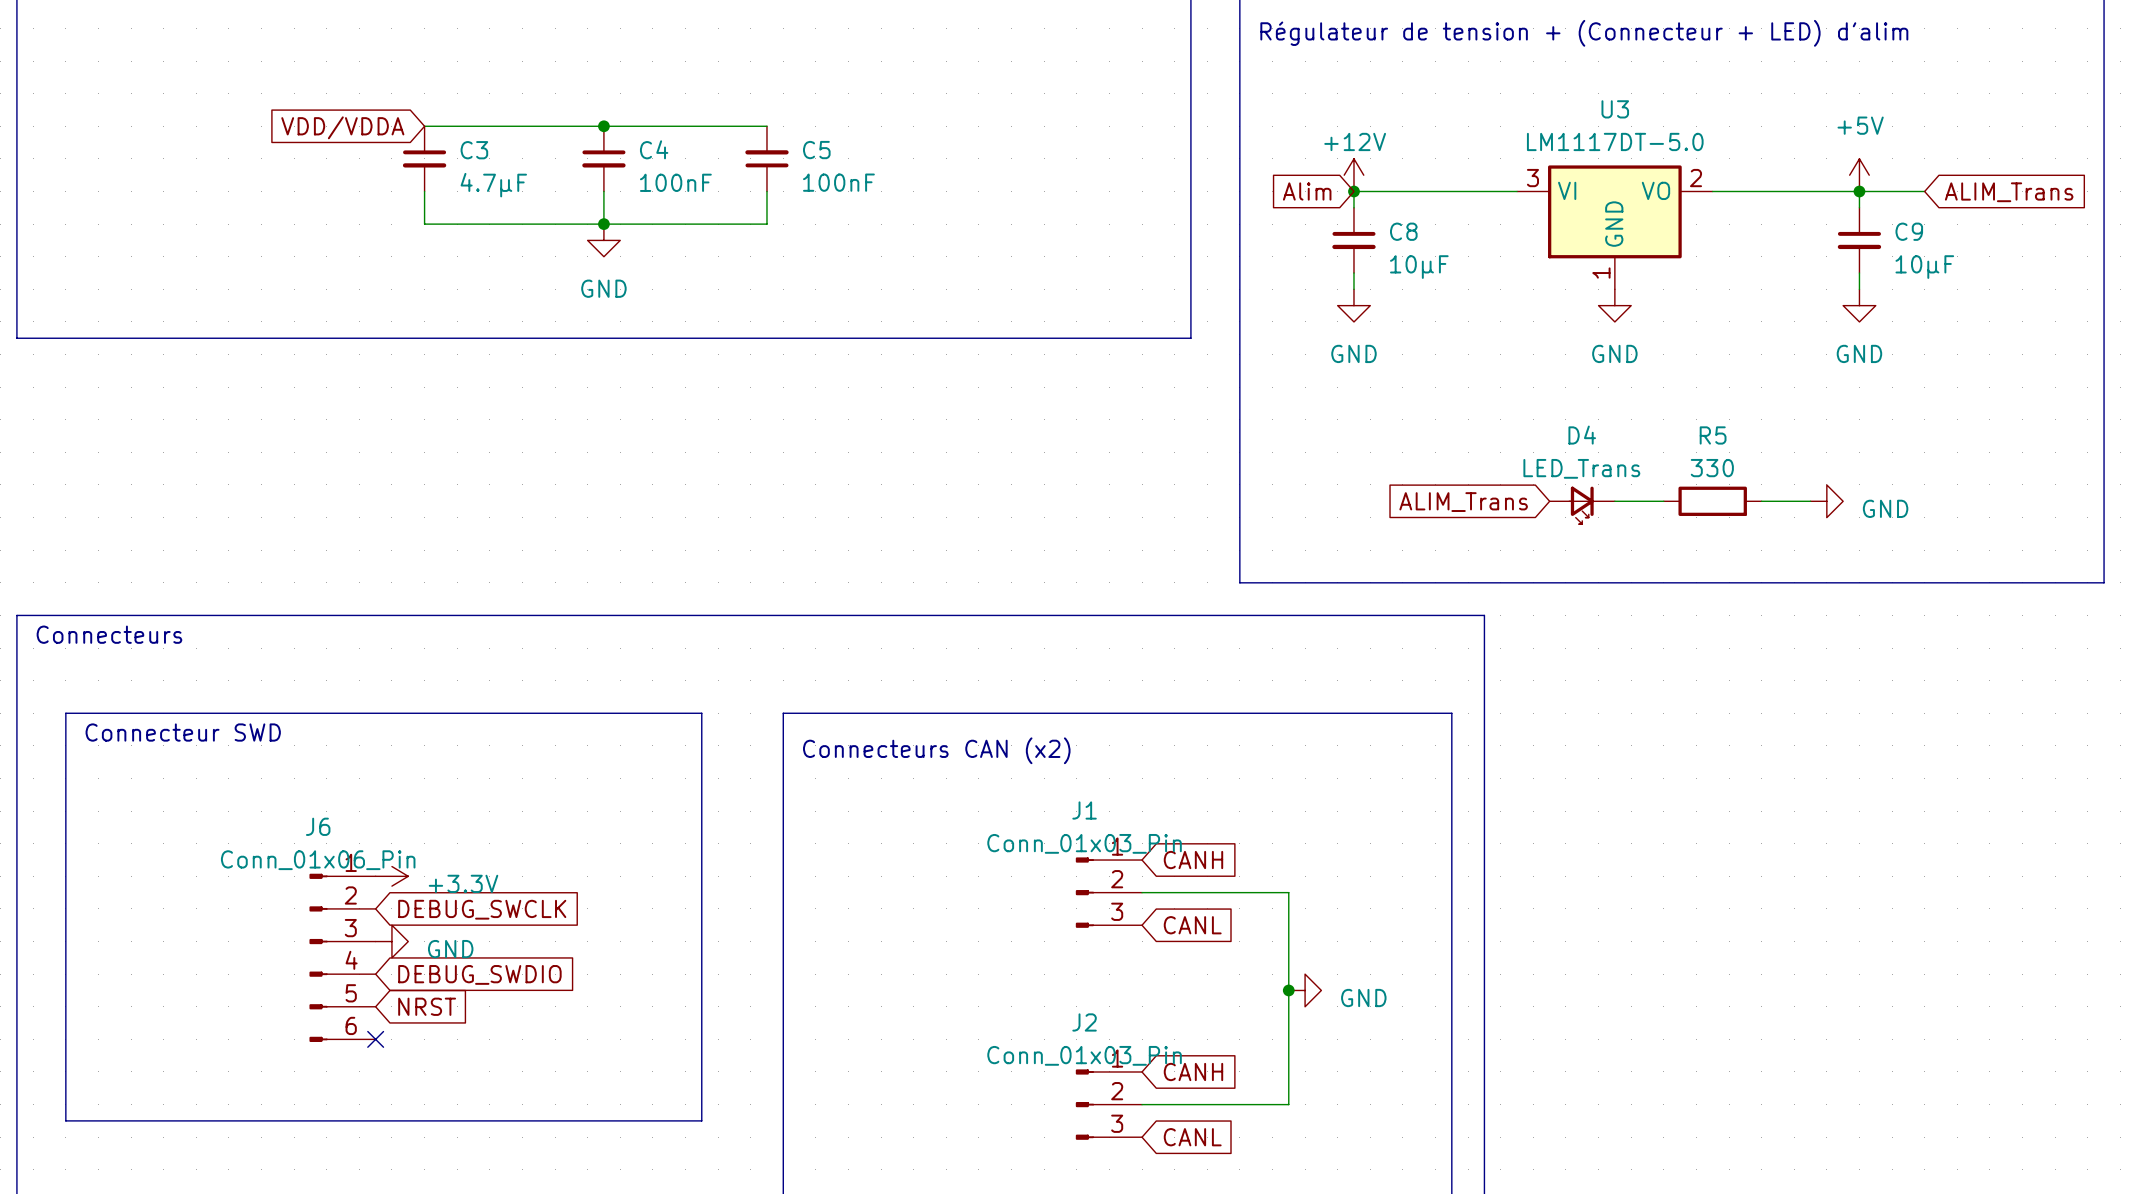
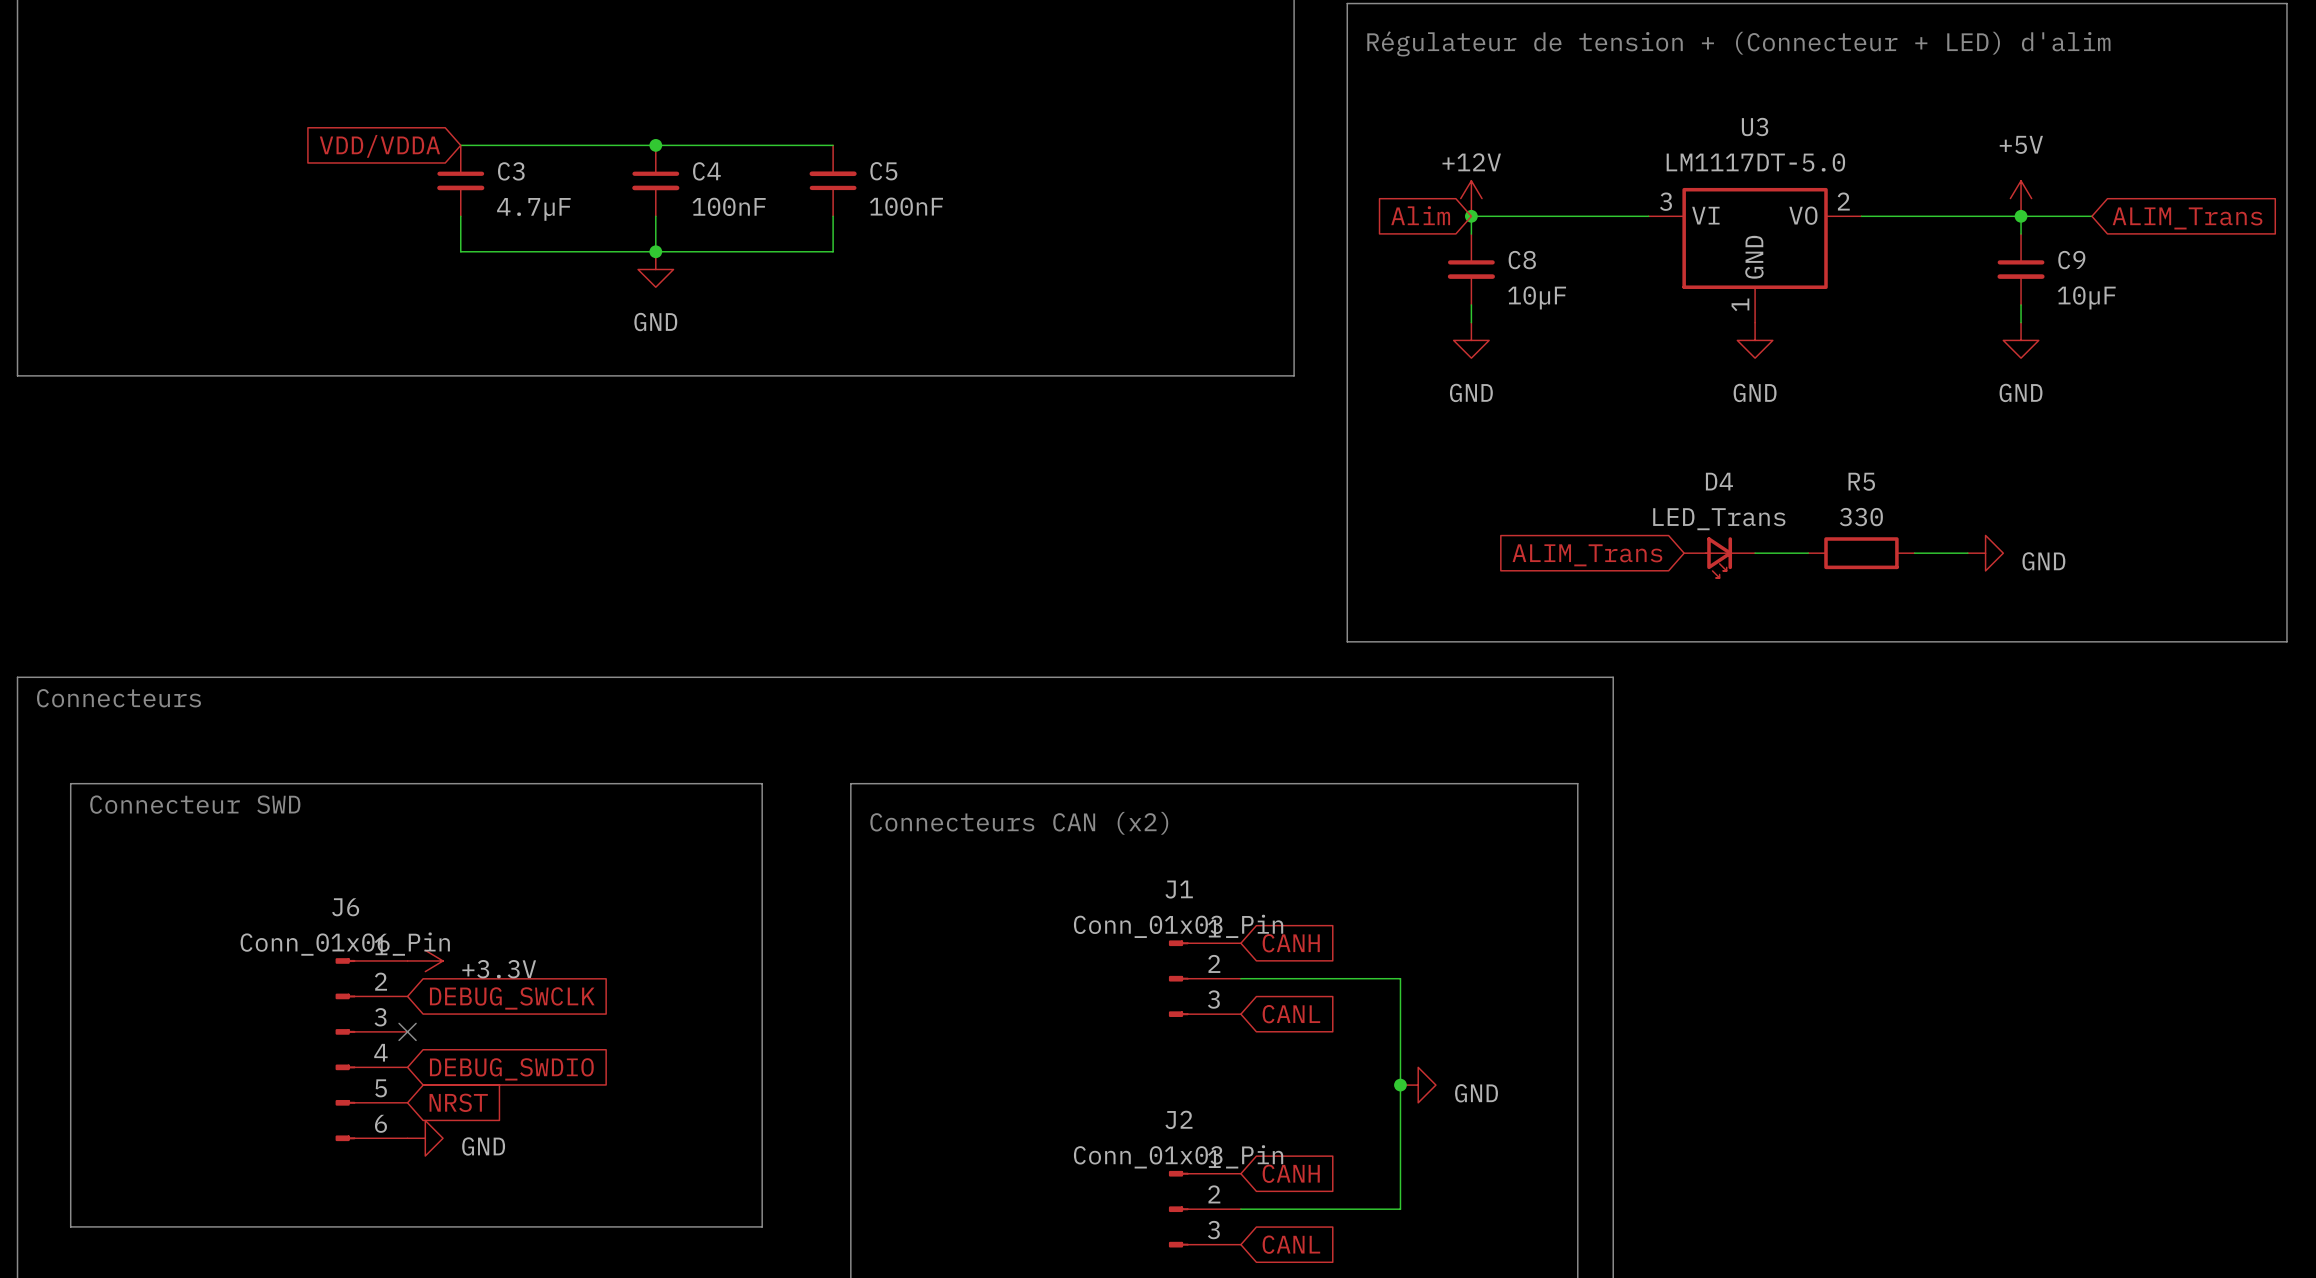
no-connect mark: none -> (407, 1031)
power symbol position: GND (391, 941) -> GND (425, 1138)
no-connect mark: (375, 1039) -> none

